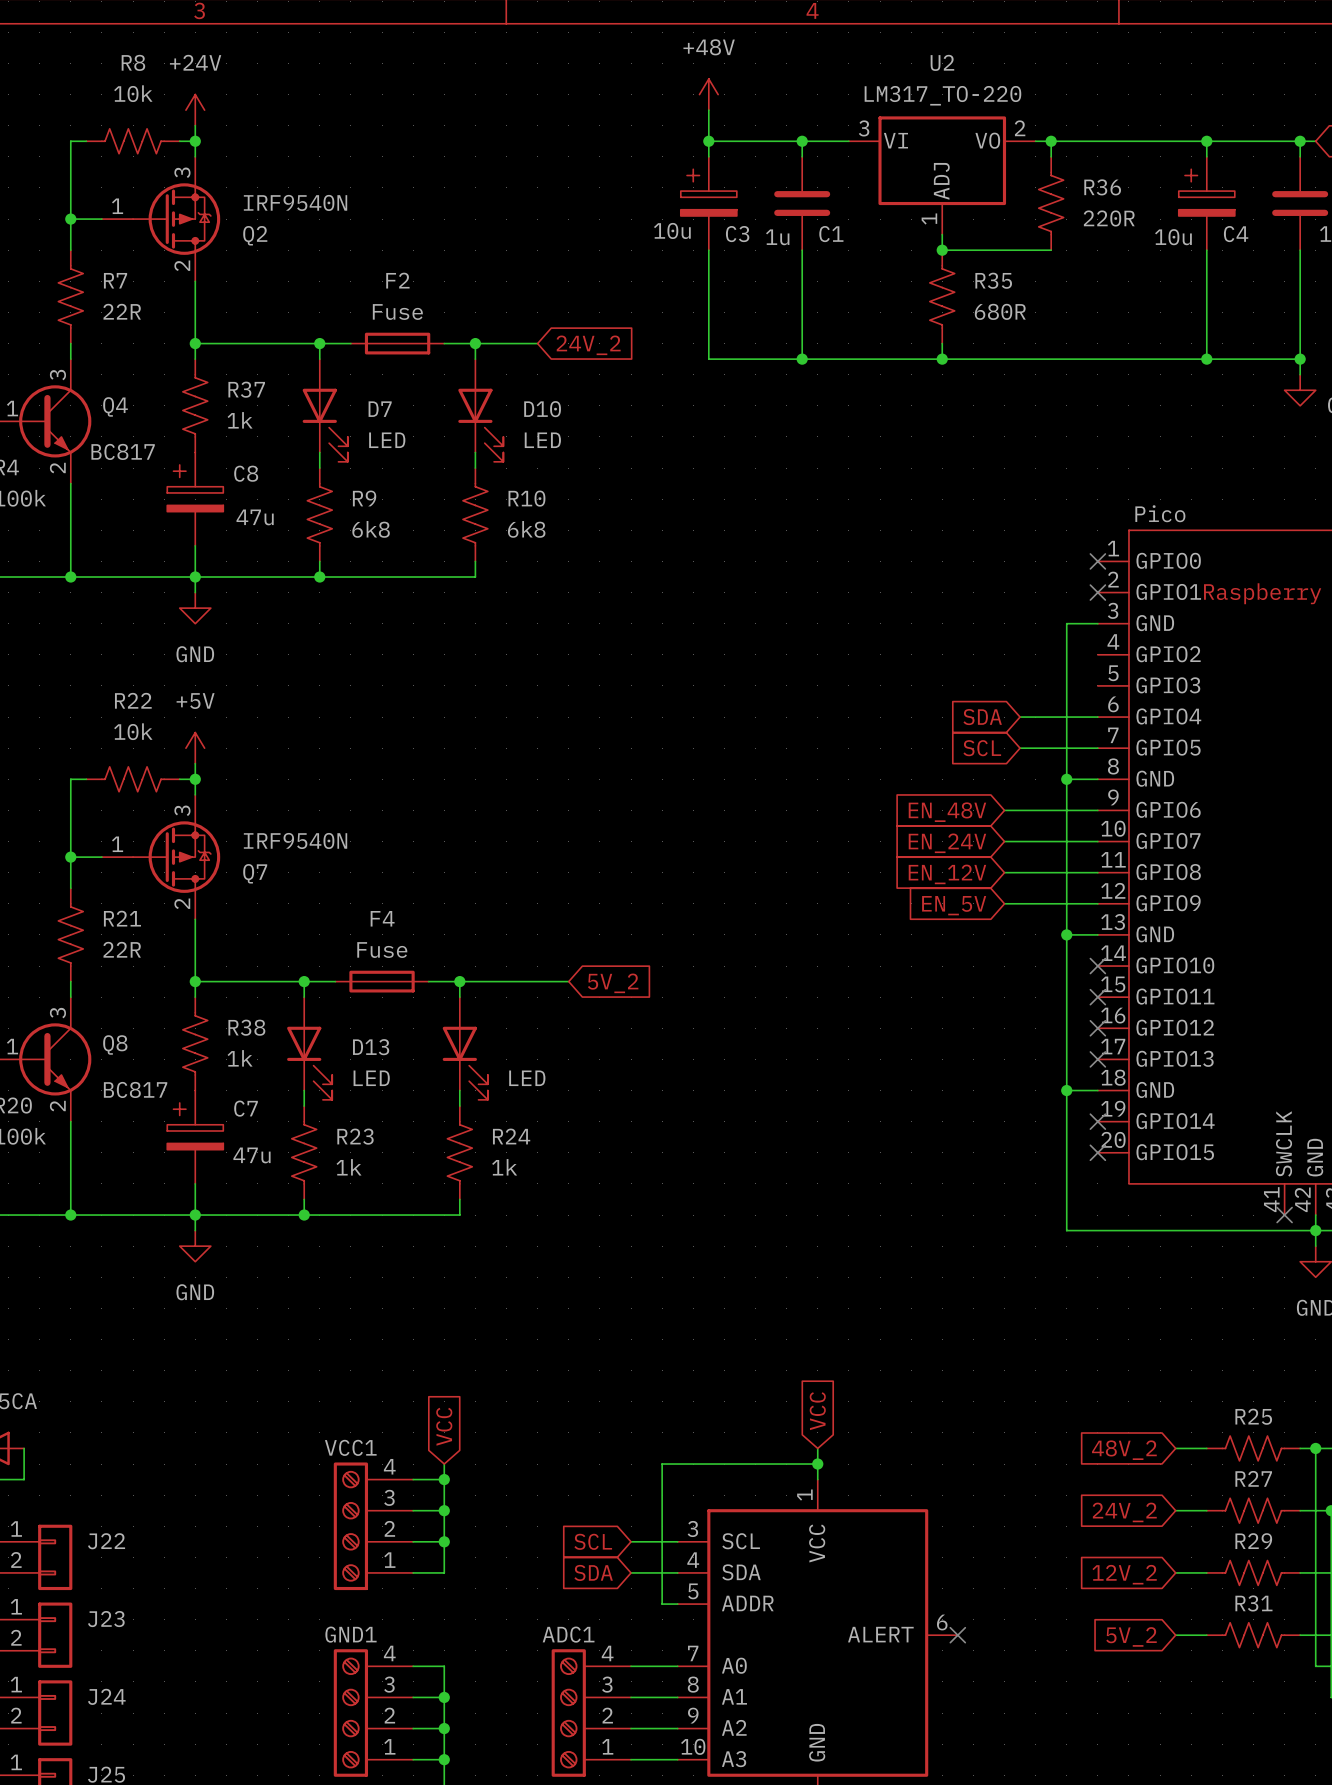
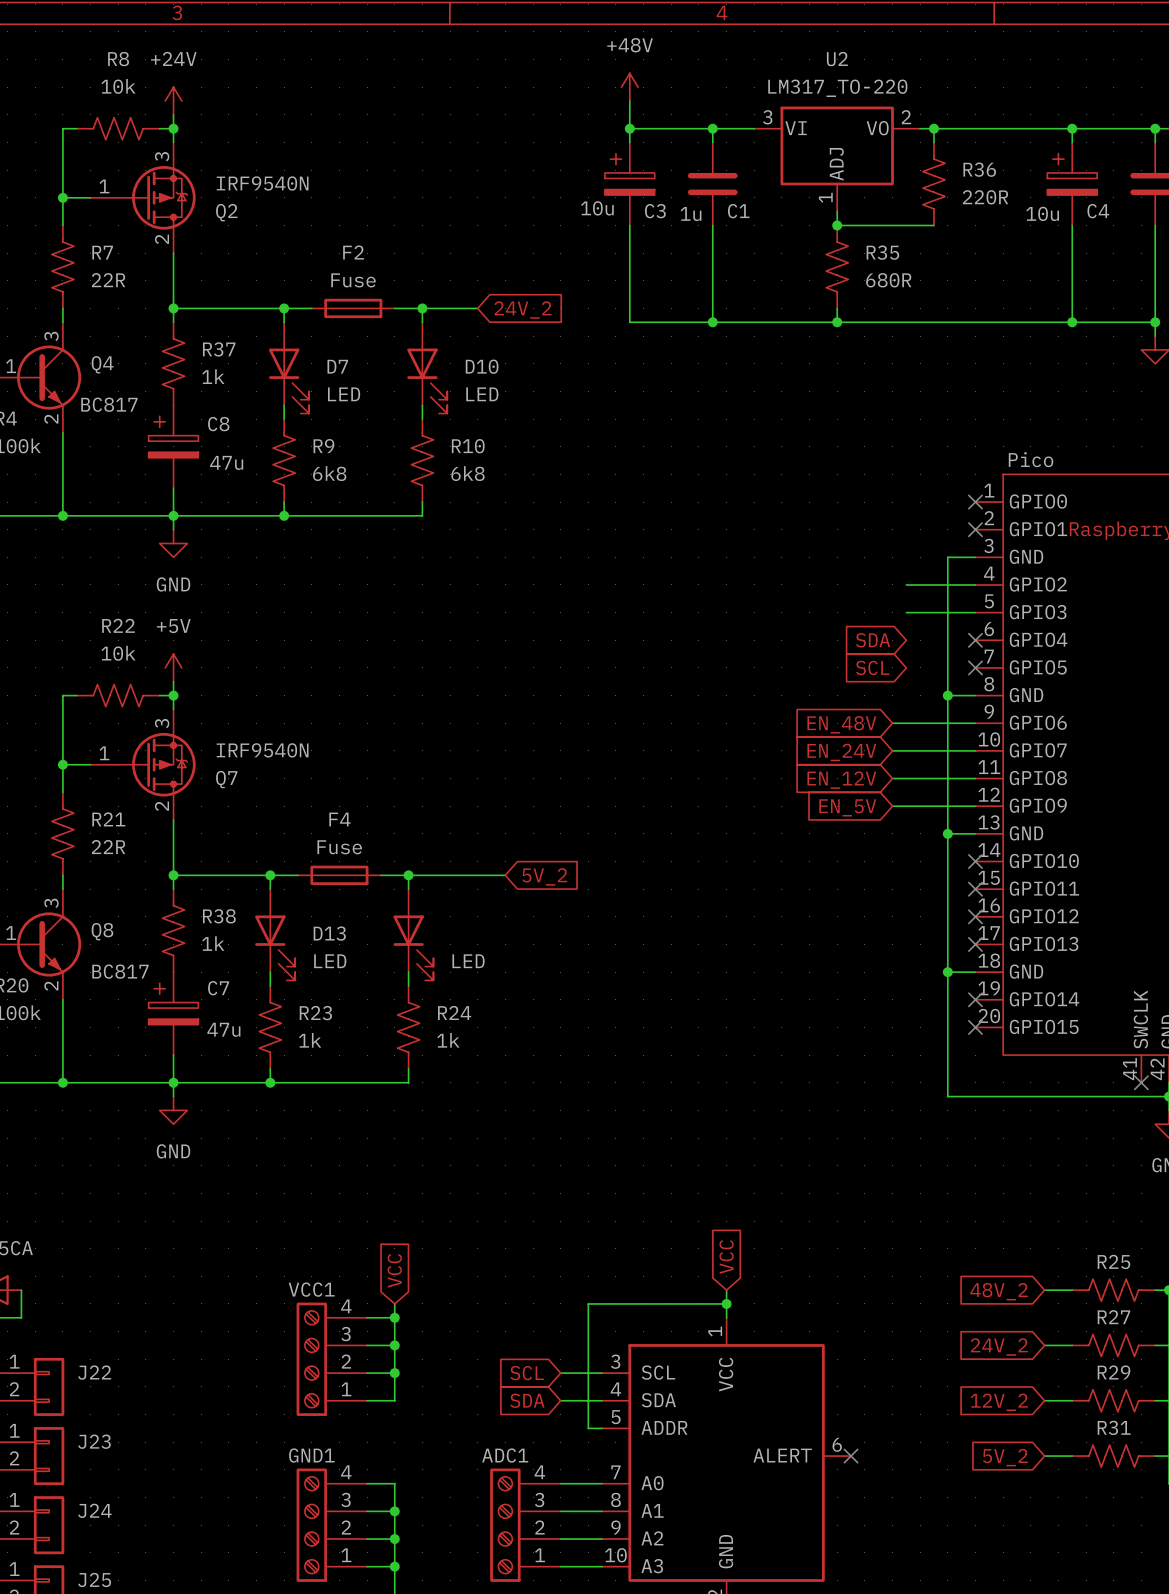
wire: (1020, 717) (1097, 717) -> (906, 584) (975, 584)
no-connect mark: none -> (975, 640)
wire: (1020, 748) (1097, 748) -> (906, 612) (975, 612)
no-connect mark: none -> (975, 667)

